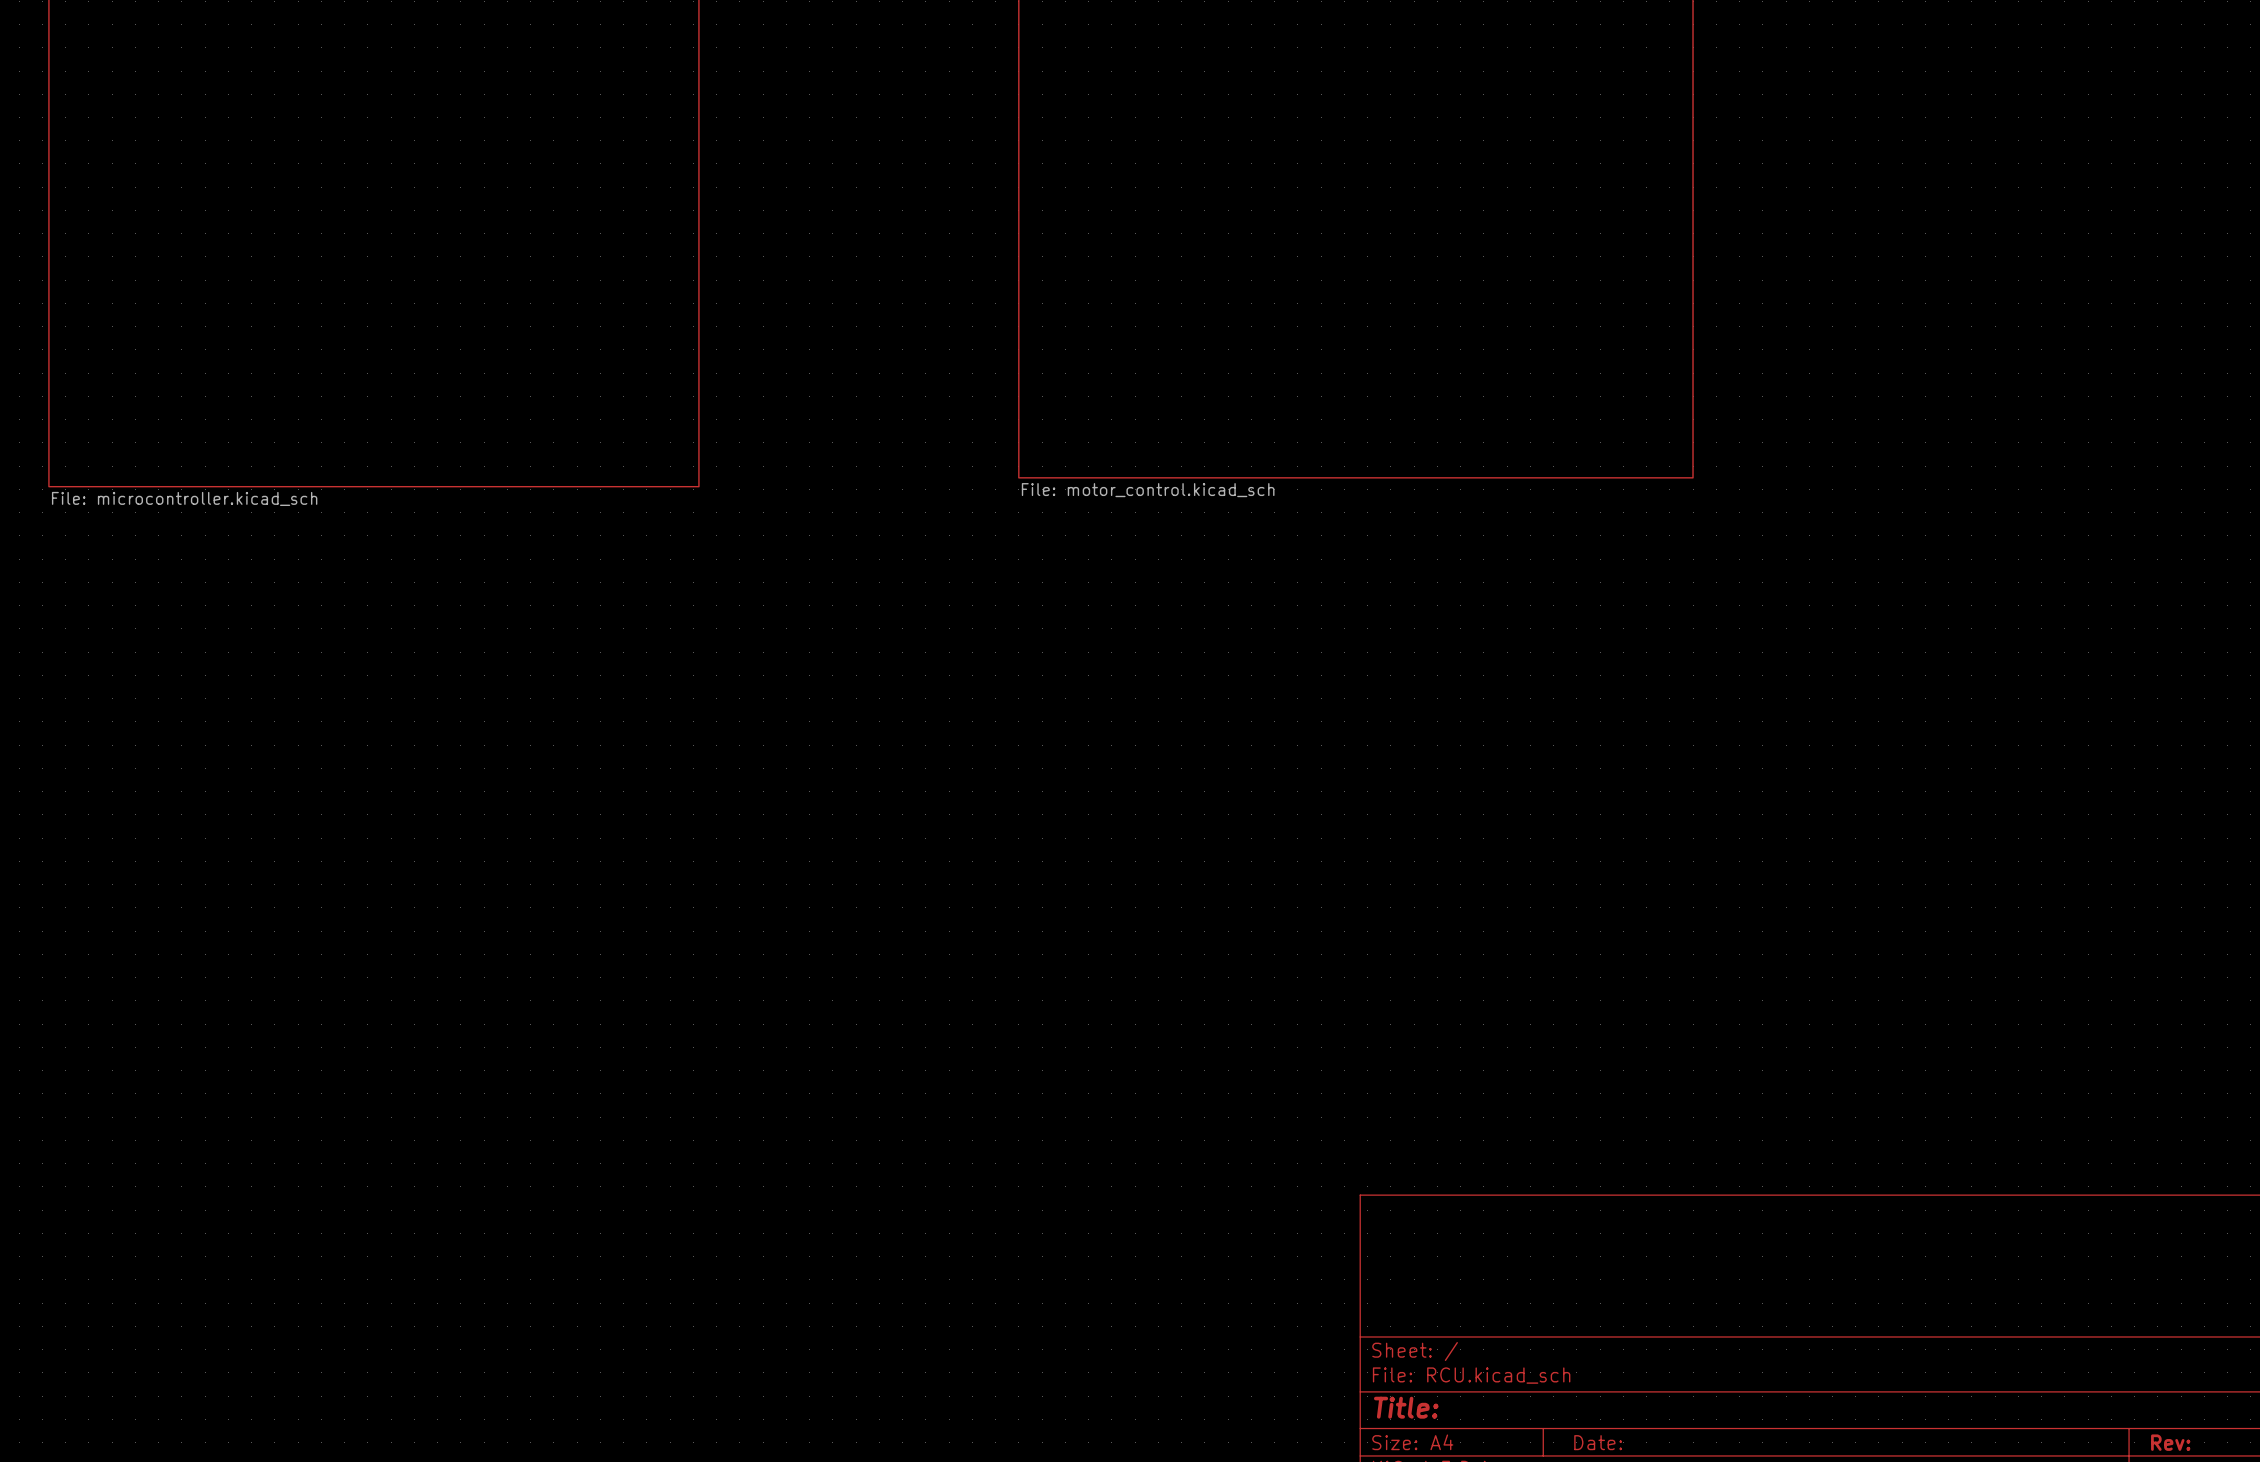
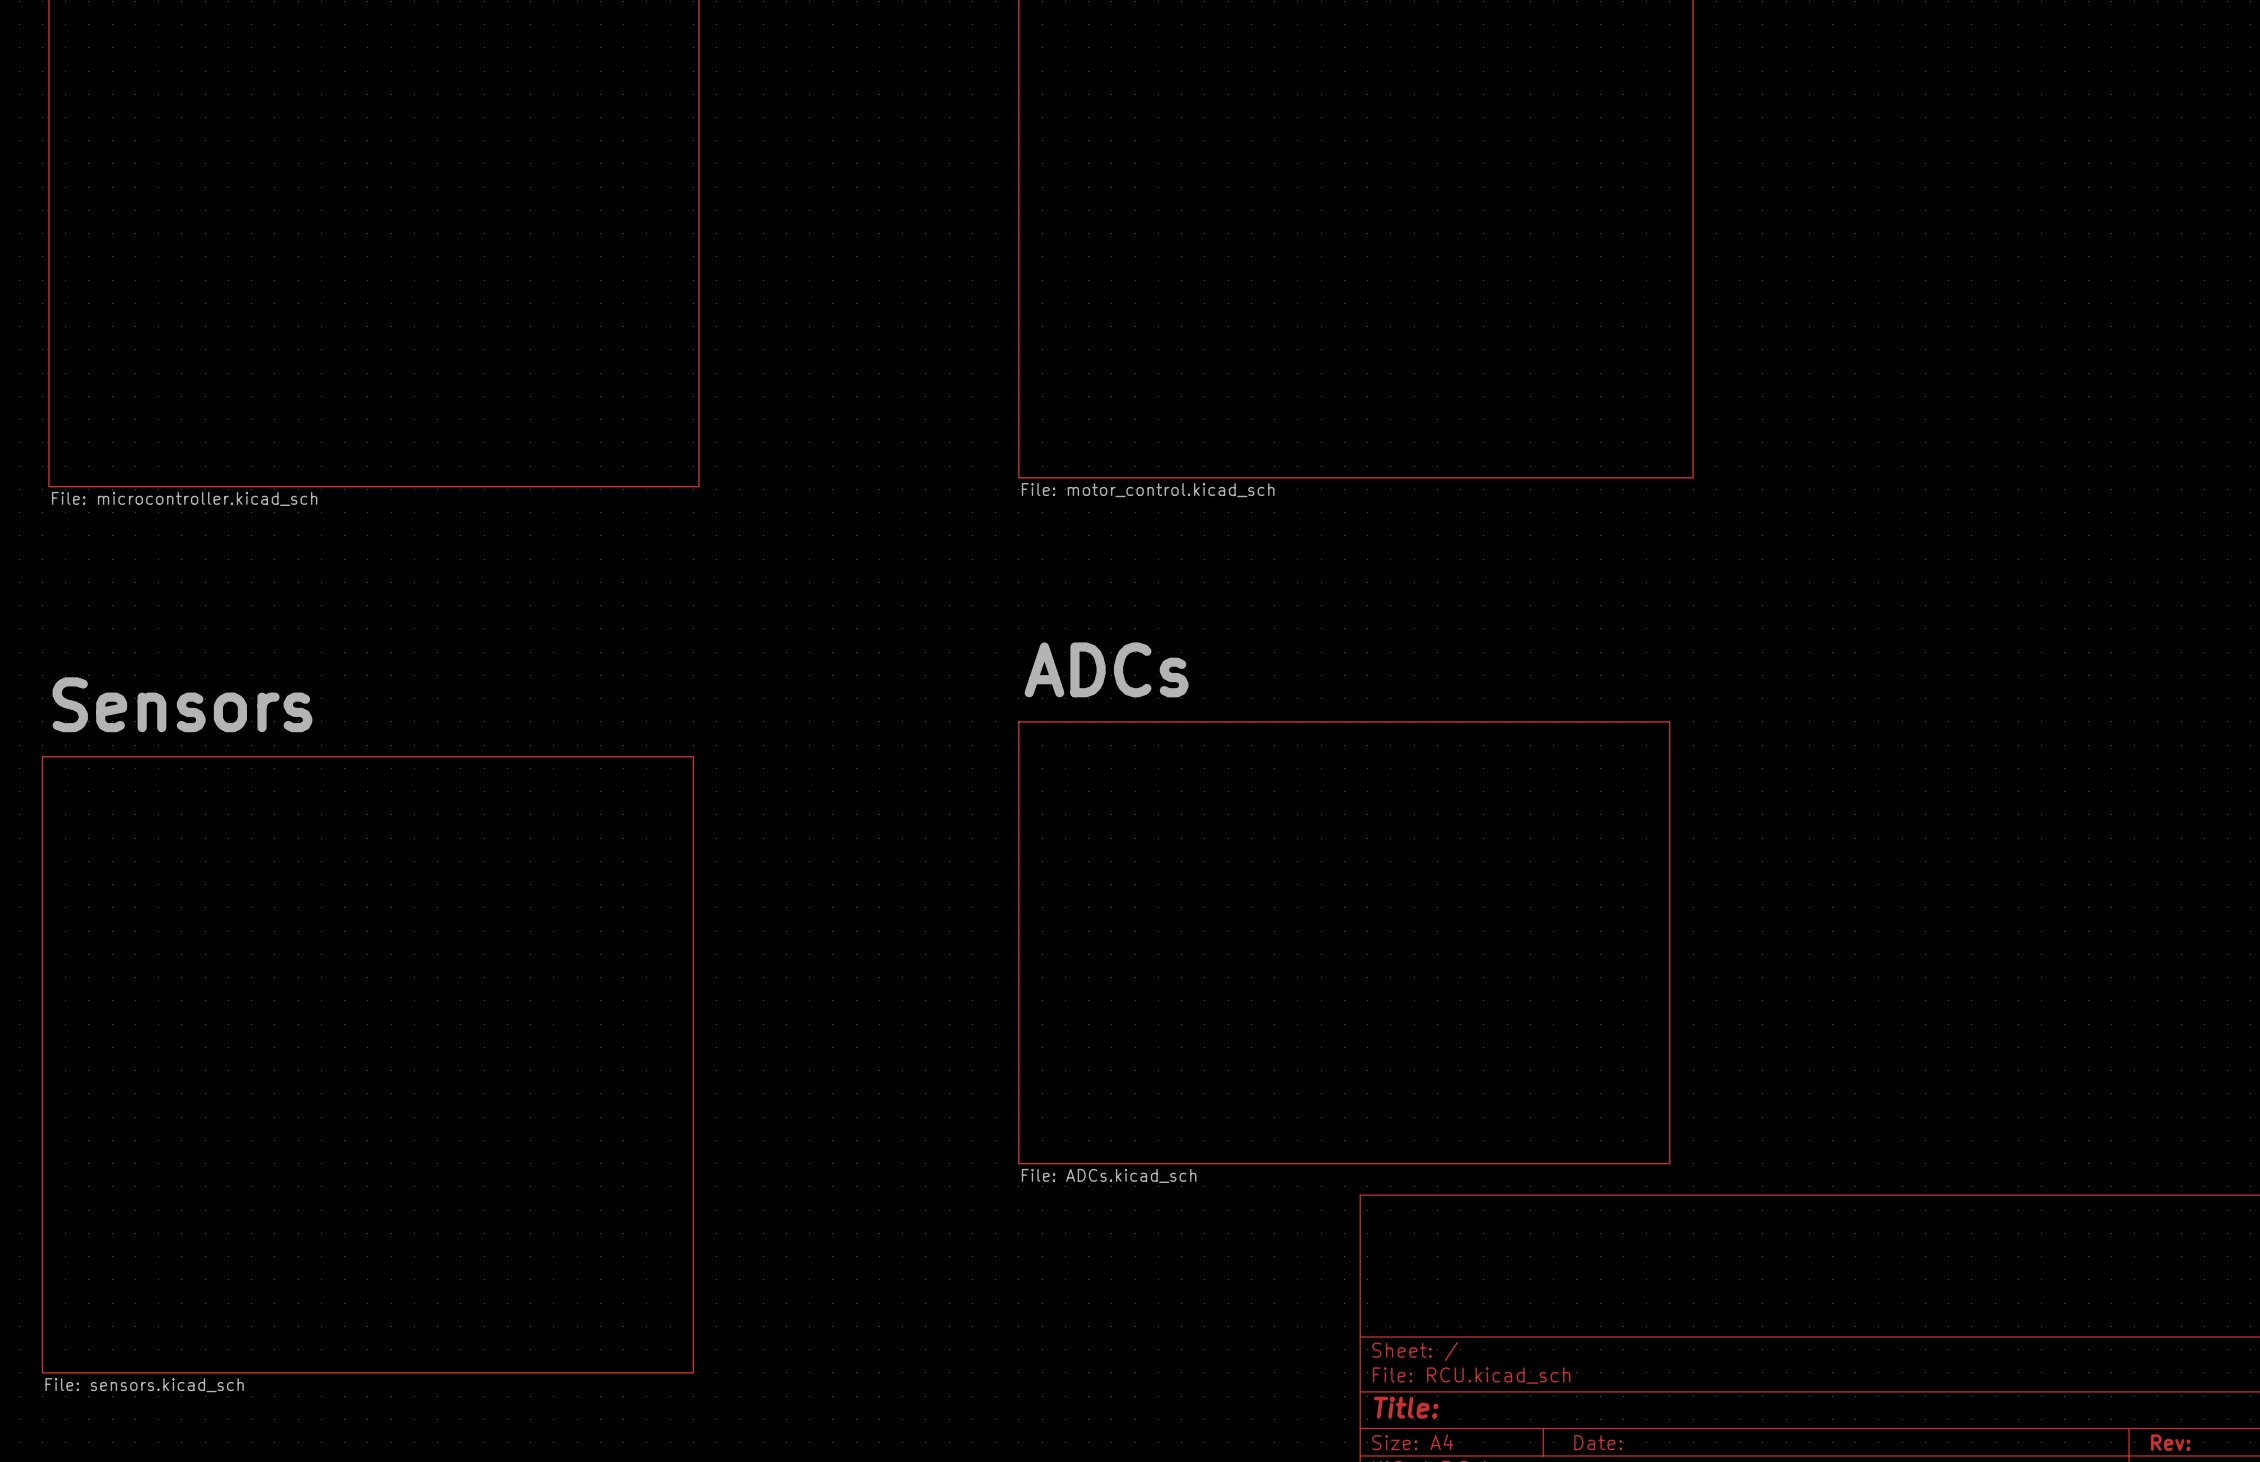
sheet ADCs: none -> File: ADCs.kicad_sch (1344, 942)
sheet Sensors: none -> File: sensors.kicad_sch (367, 1064)

